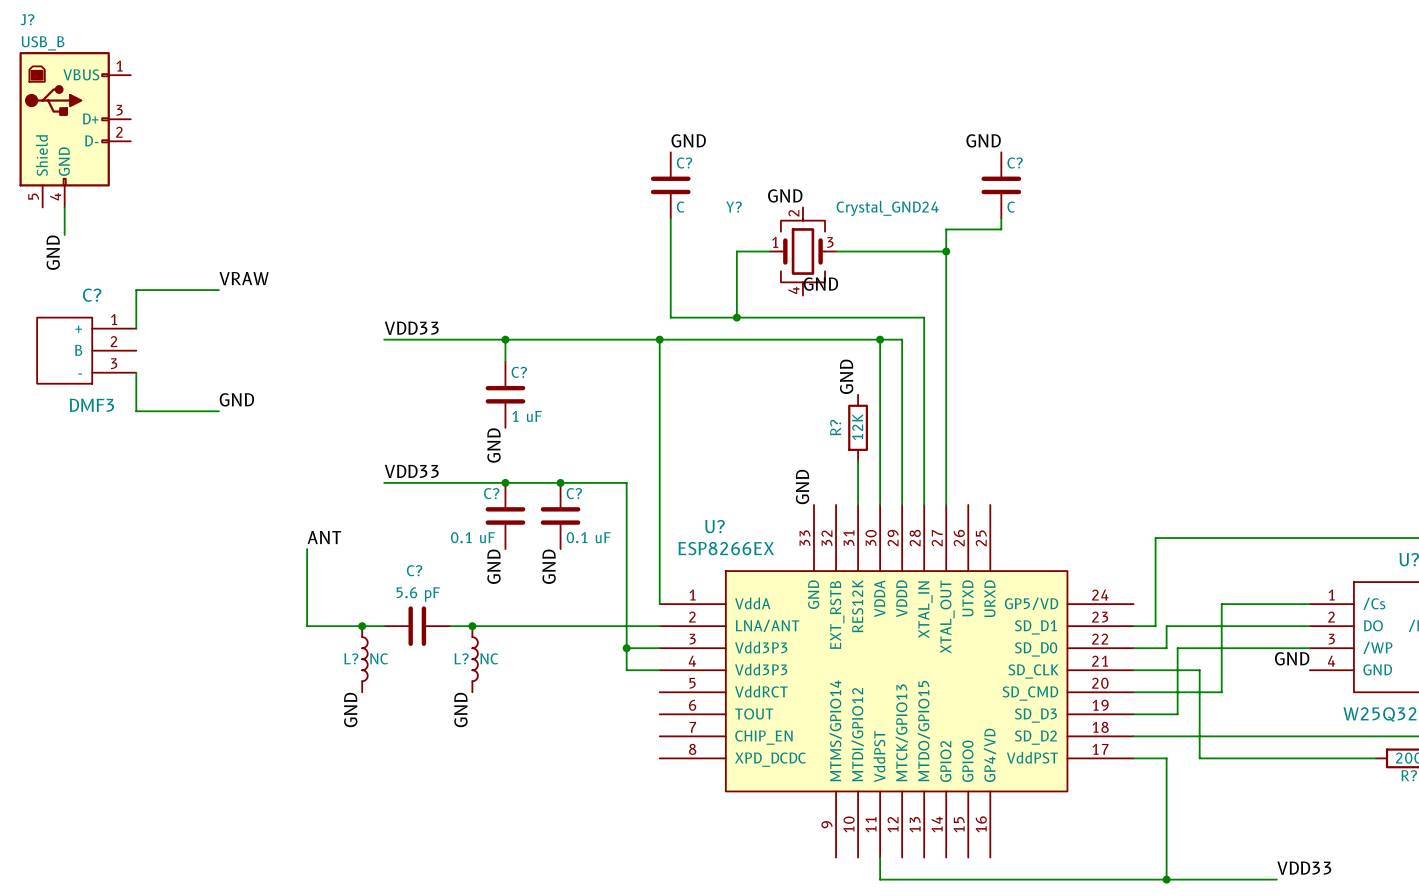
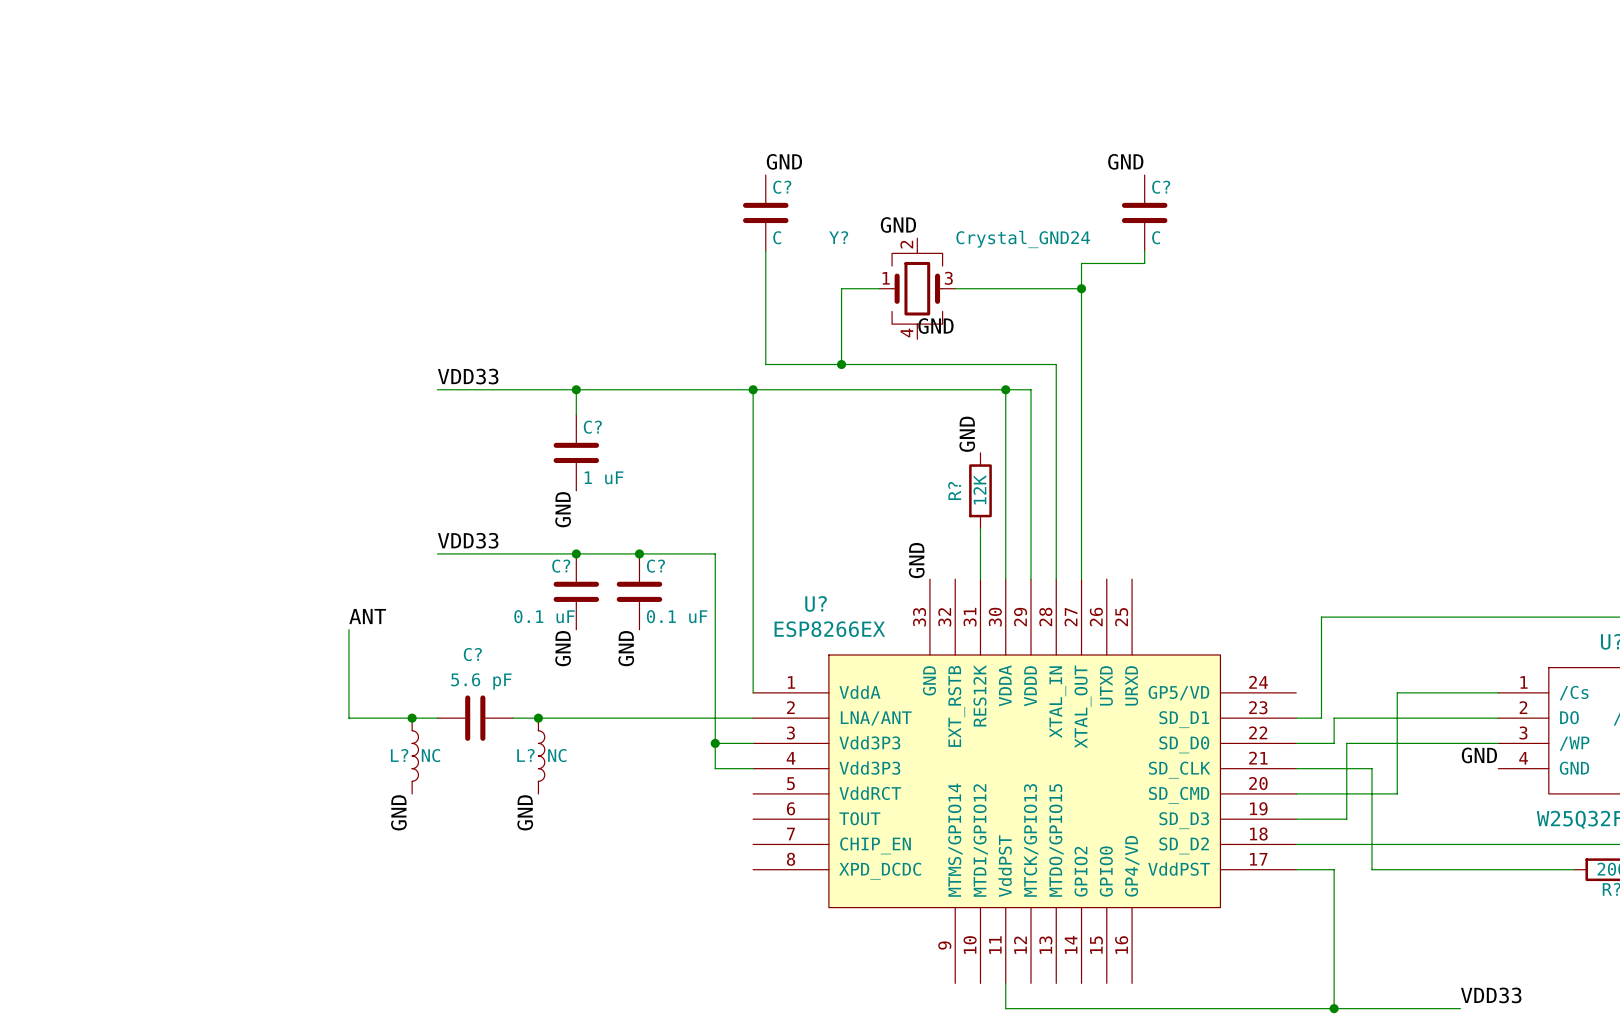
J?: USB_B (75, 129) -> none
wire: (64, 207) (64, 234) -> none
label: GND (53, 252) -> none
label: VRAW (244, 278) -> none
wire: (218, 290) (136, 290) (136, 328) -> none
C?: DMF3 (86, 350) -> none
wire: (136, 372) (136, 411) (218, 411) -> none
label: GND (236, 399) -> none

